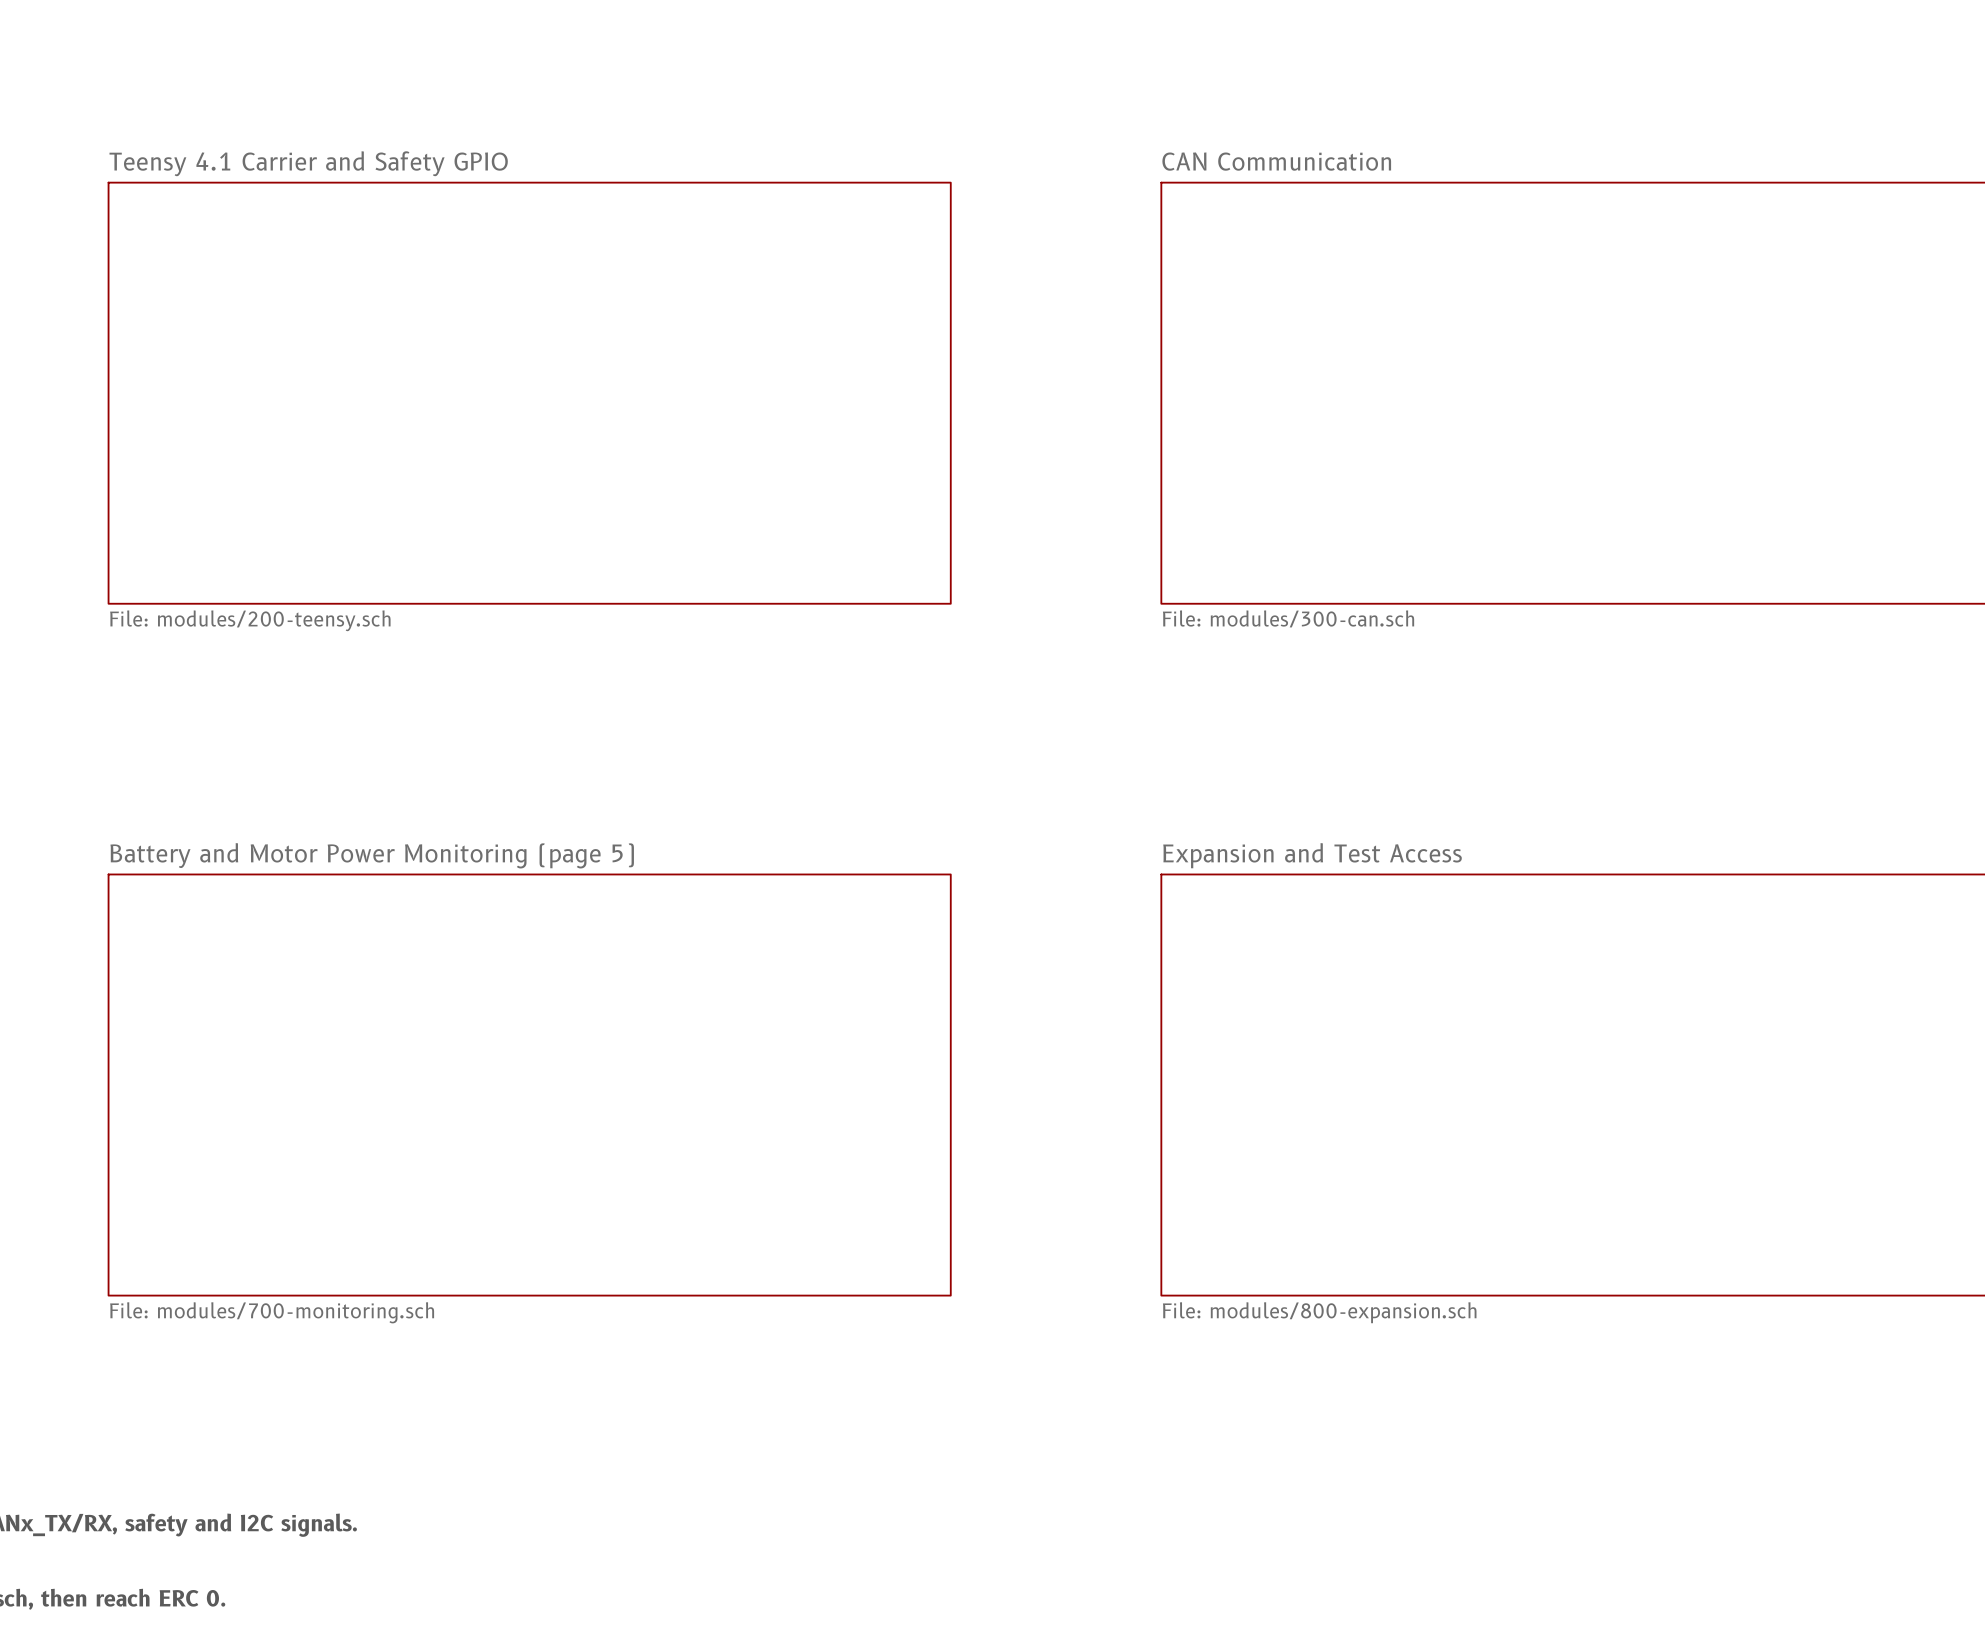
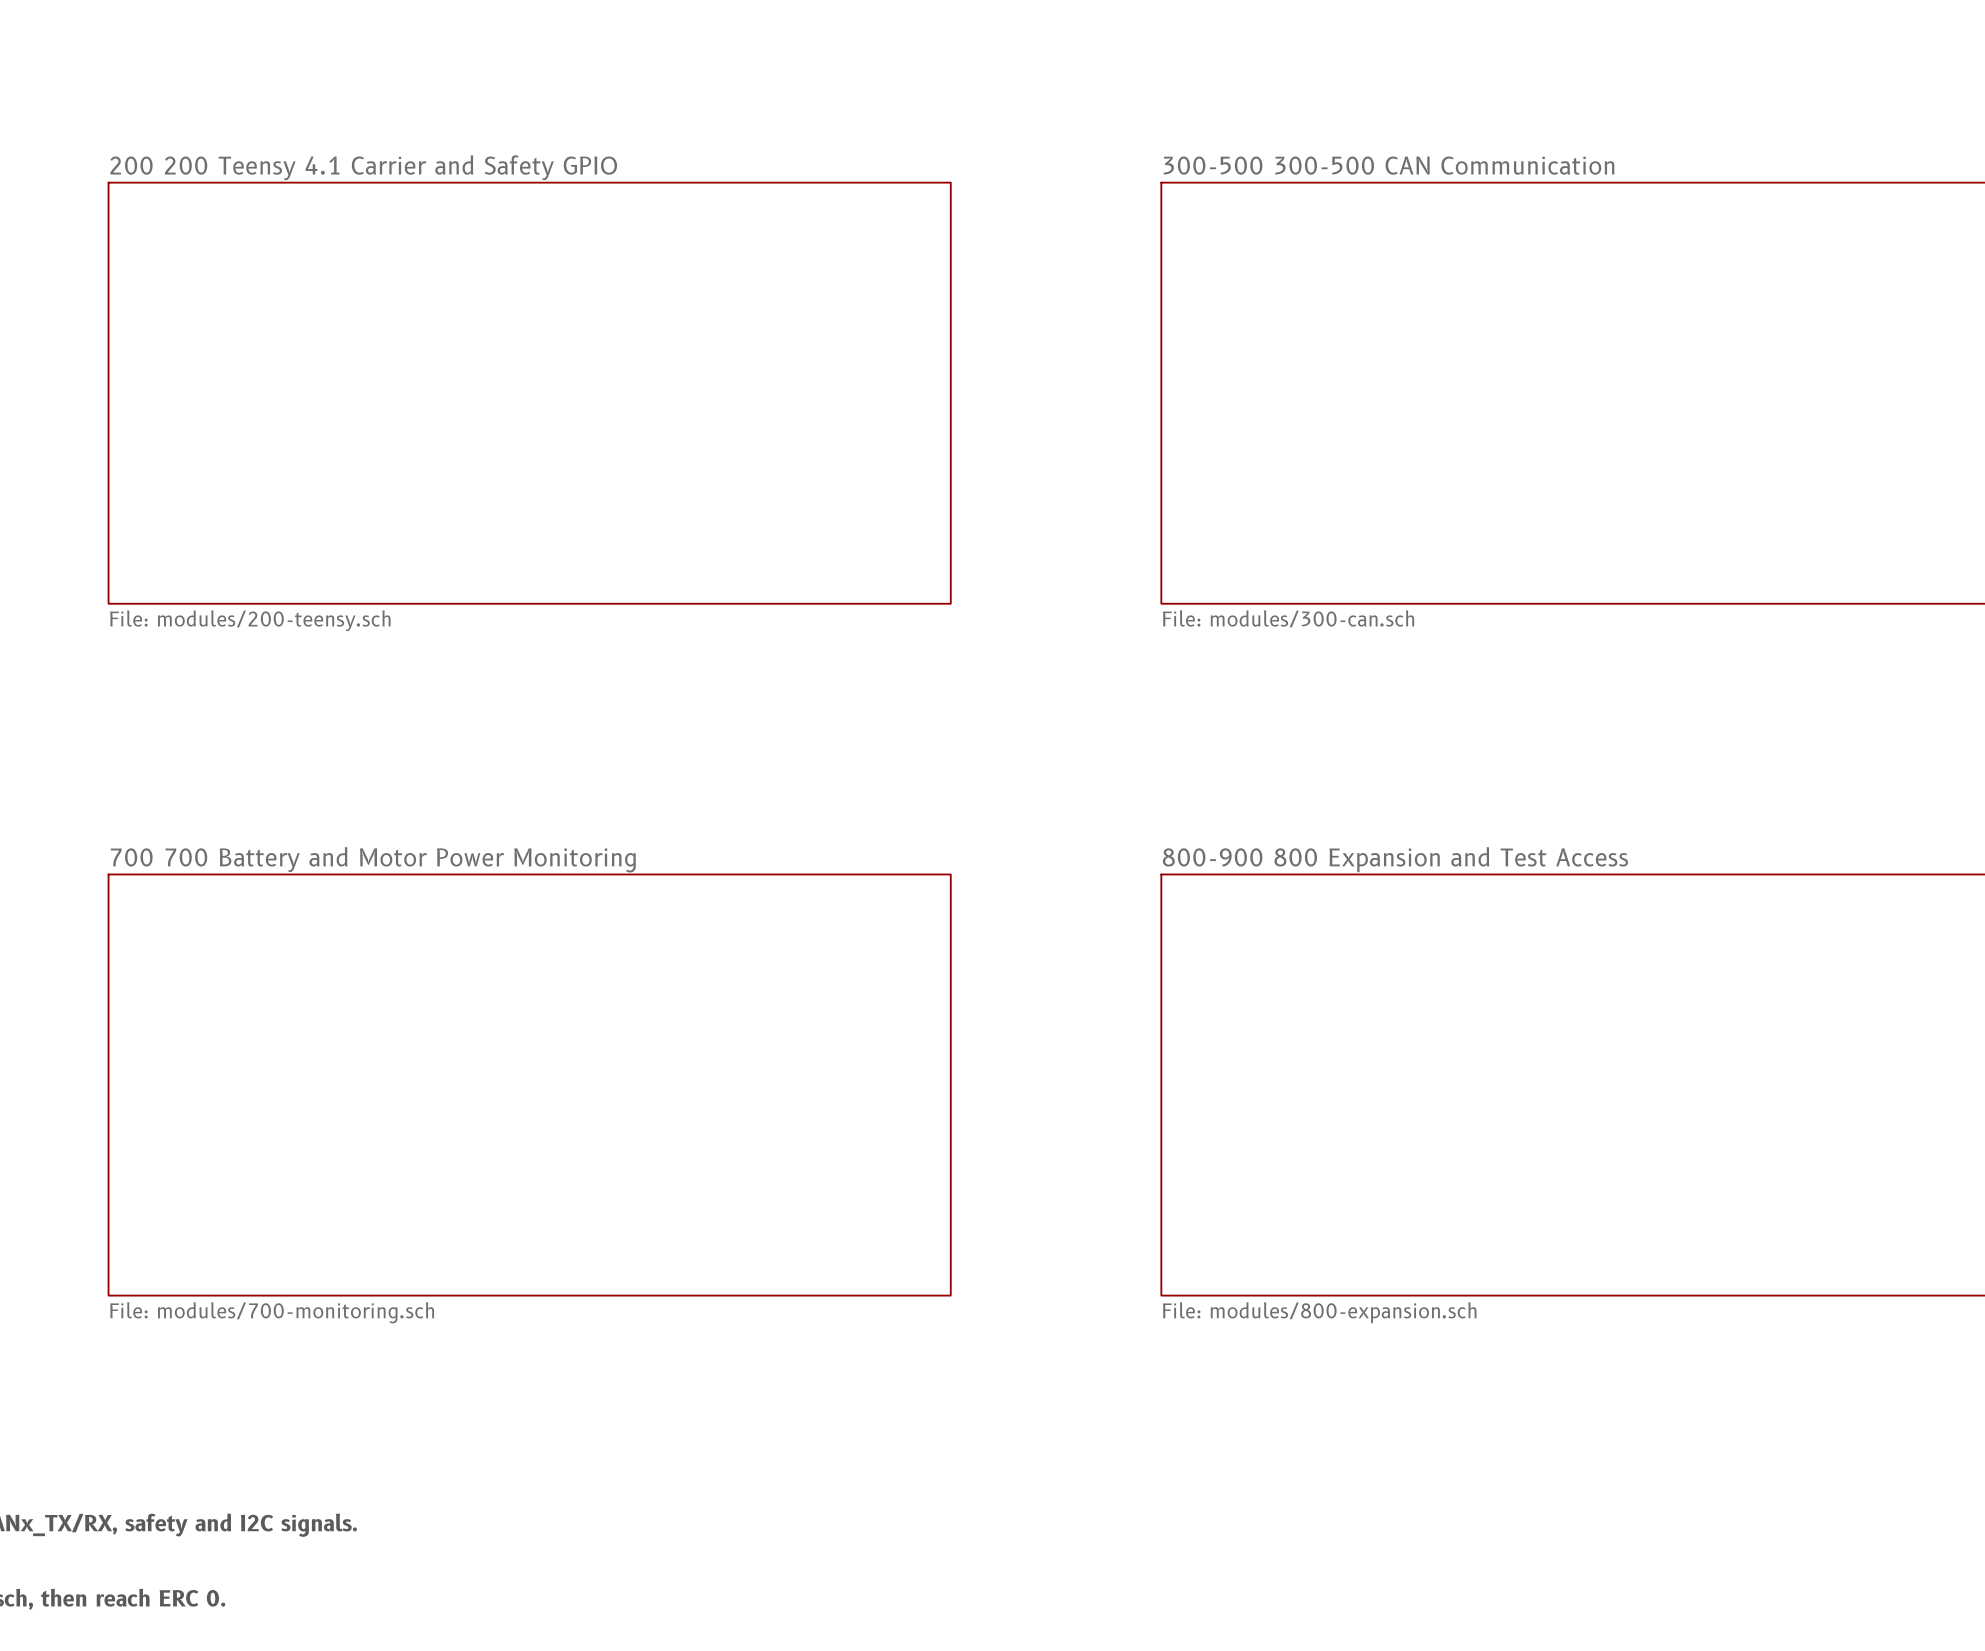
sheet CAN Communication name: CAN Communication (1276, 161) -> 300-500 300-500 CAN Communication (1389, 165)
sheet Teensy 4.1 Carrier and Safety GPIO name: Teensy 4.1 Carrier and Safety GPIO (308, 163) -> 200 200 Teensy 4.1 Carrier and Safety GPIO (363, 167)
sheet Battery and Motor Power Monitoring (page 5) name: Battery and Motor Power Monitoring (page 5) (372, 855) -> 700 700 Battery and Motor Power Monitoring (373, 859)
sheet Expansion and Test Access name: Expansion and Test Access (1312, 855) -> 800-900 800 Expansion and Test Access (1395, 859)

